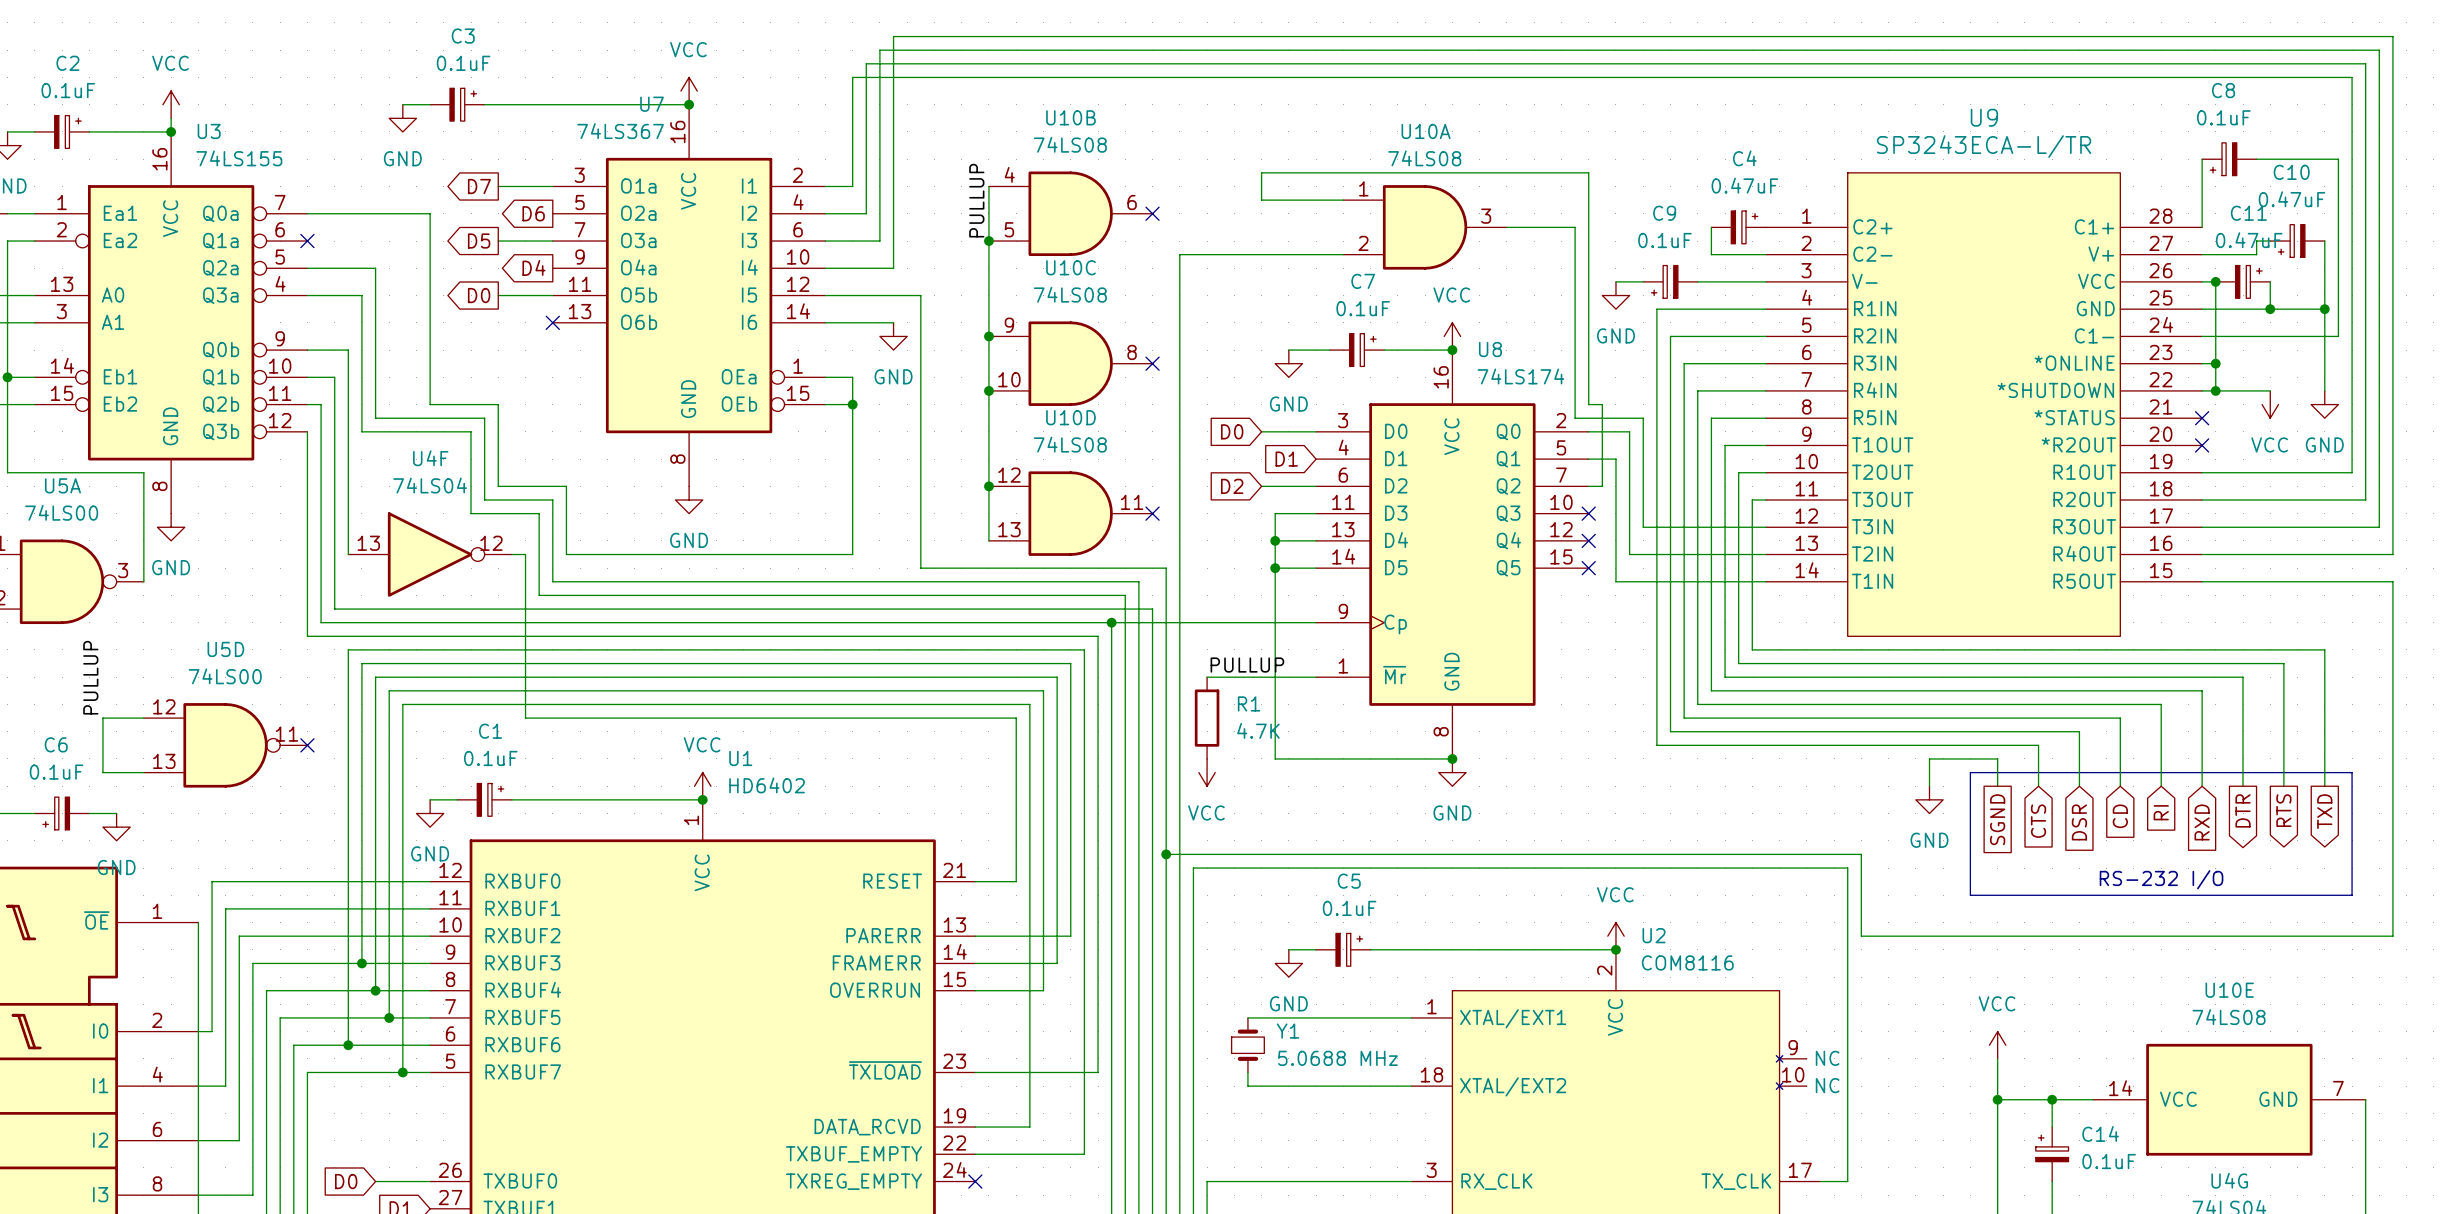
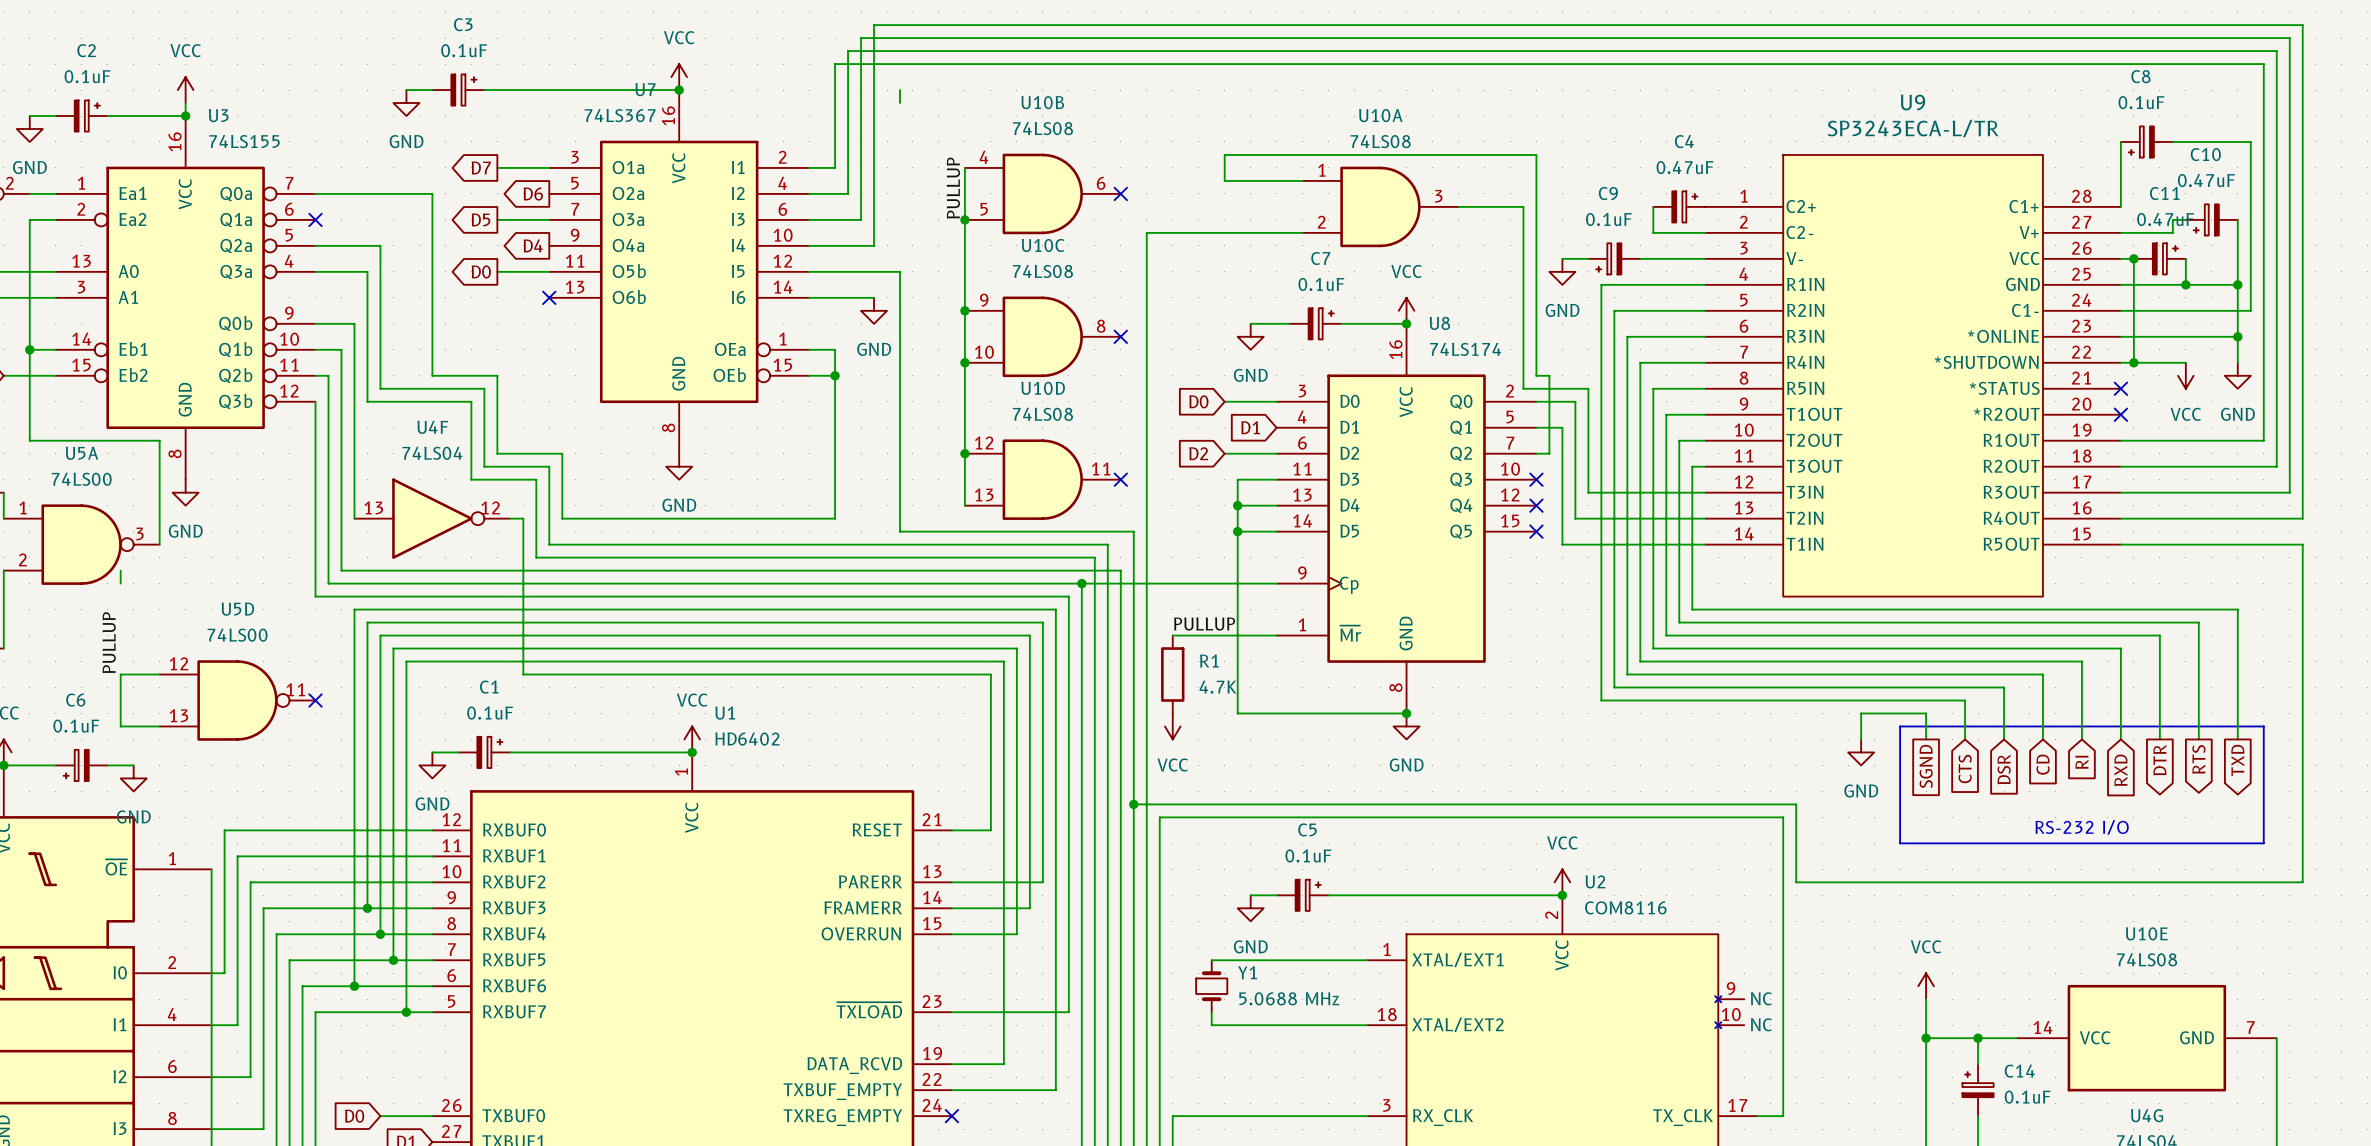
wire: none -> (899, 90) (899, 103)
wire: none -> (2133, 336) (2237, 336)
junction: (2215, 363) -> none
junction: none -> (2237, 336)
wire: none -> (120, 570) (120, 583)

